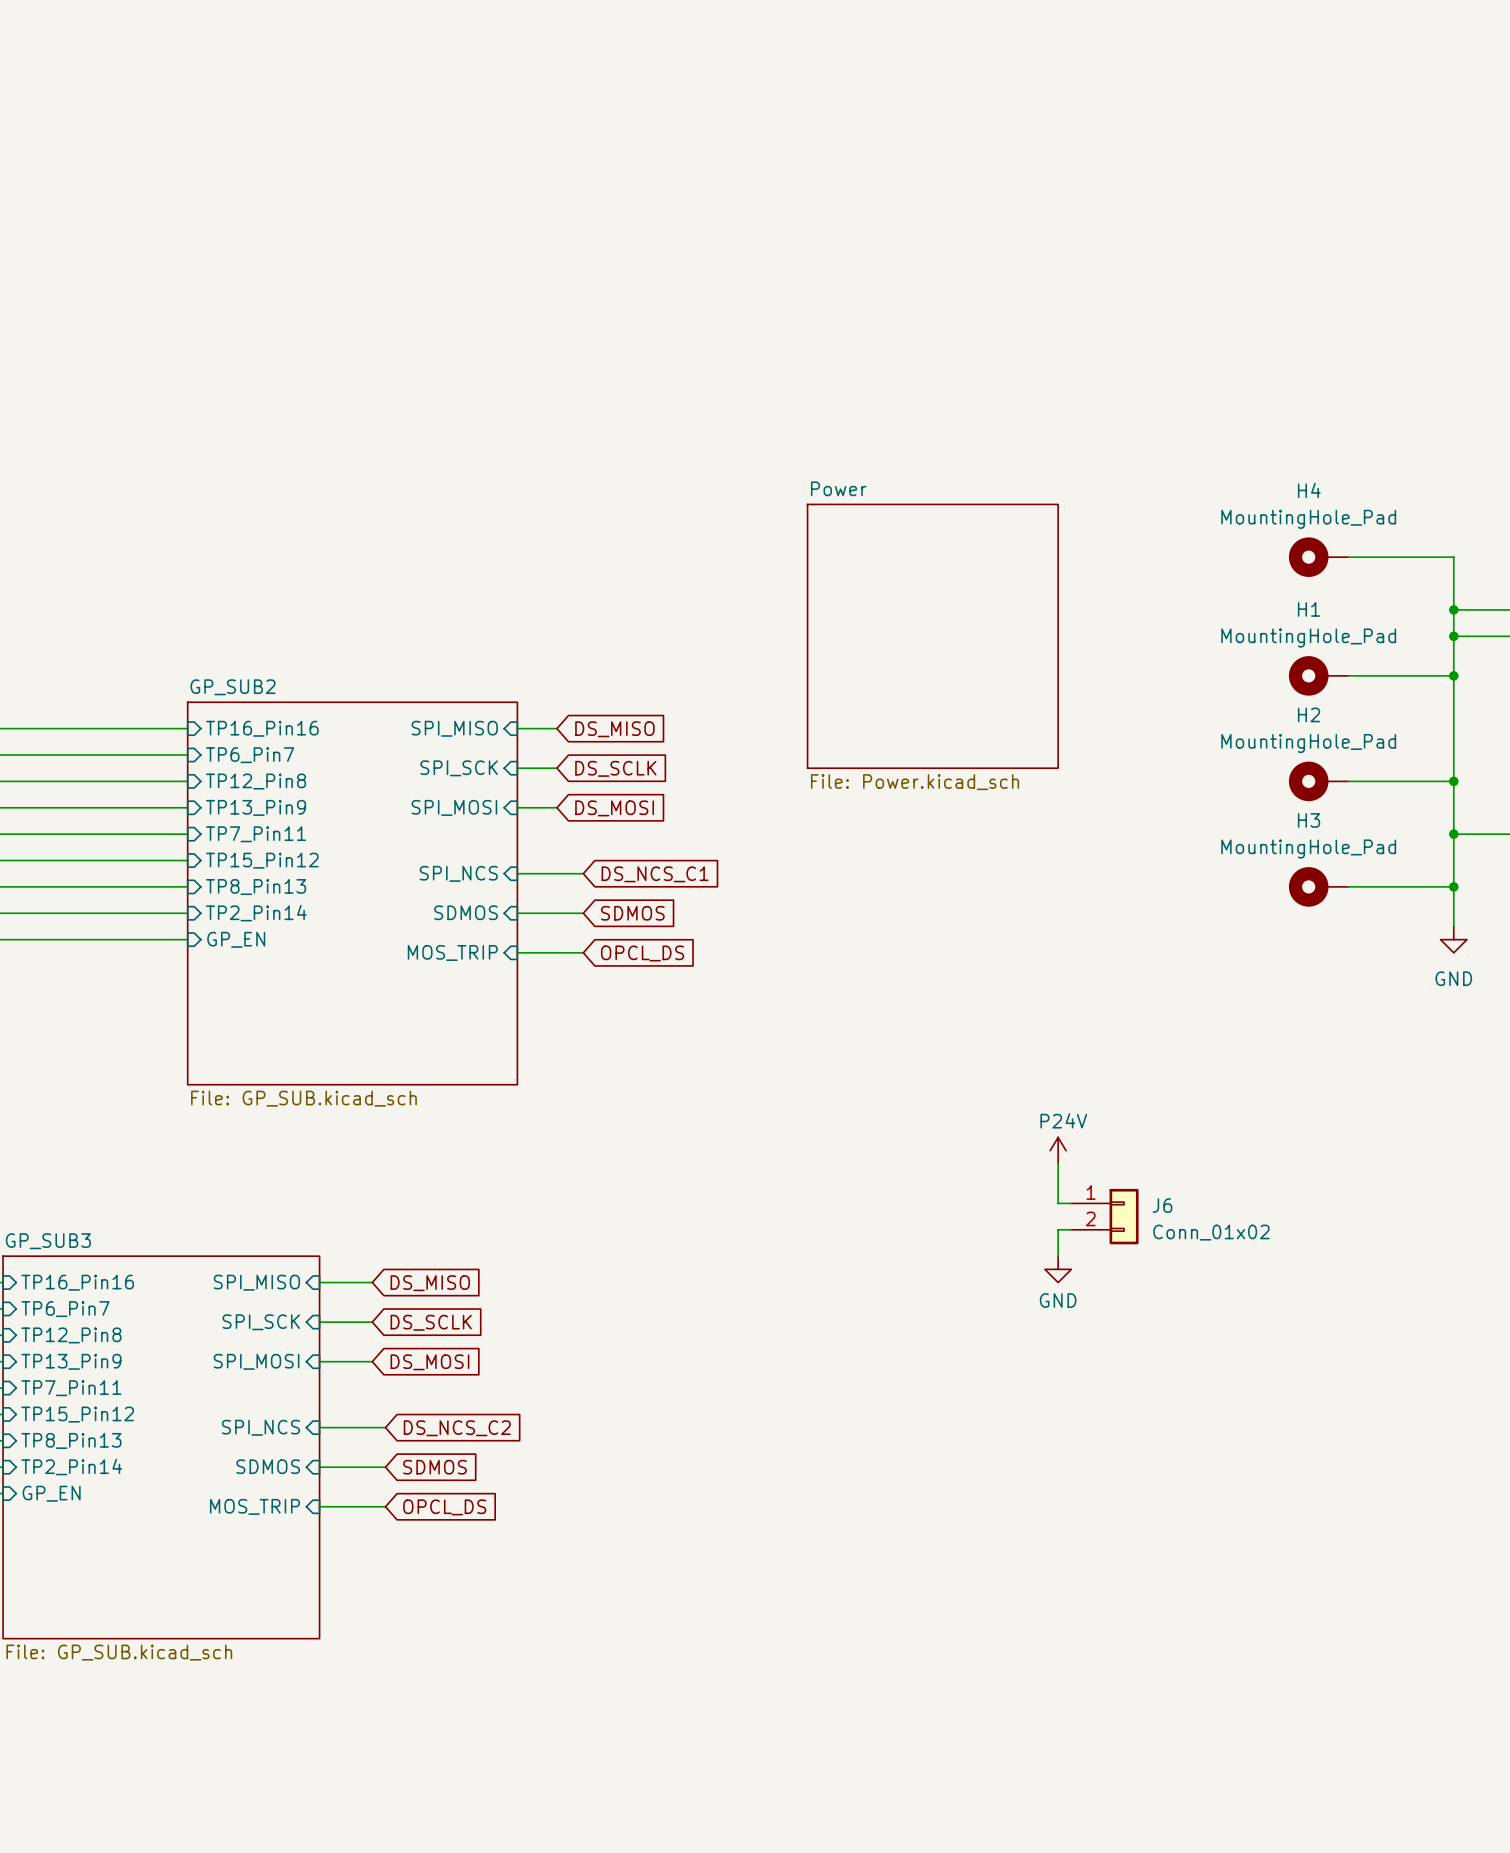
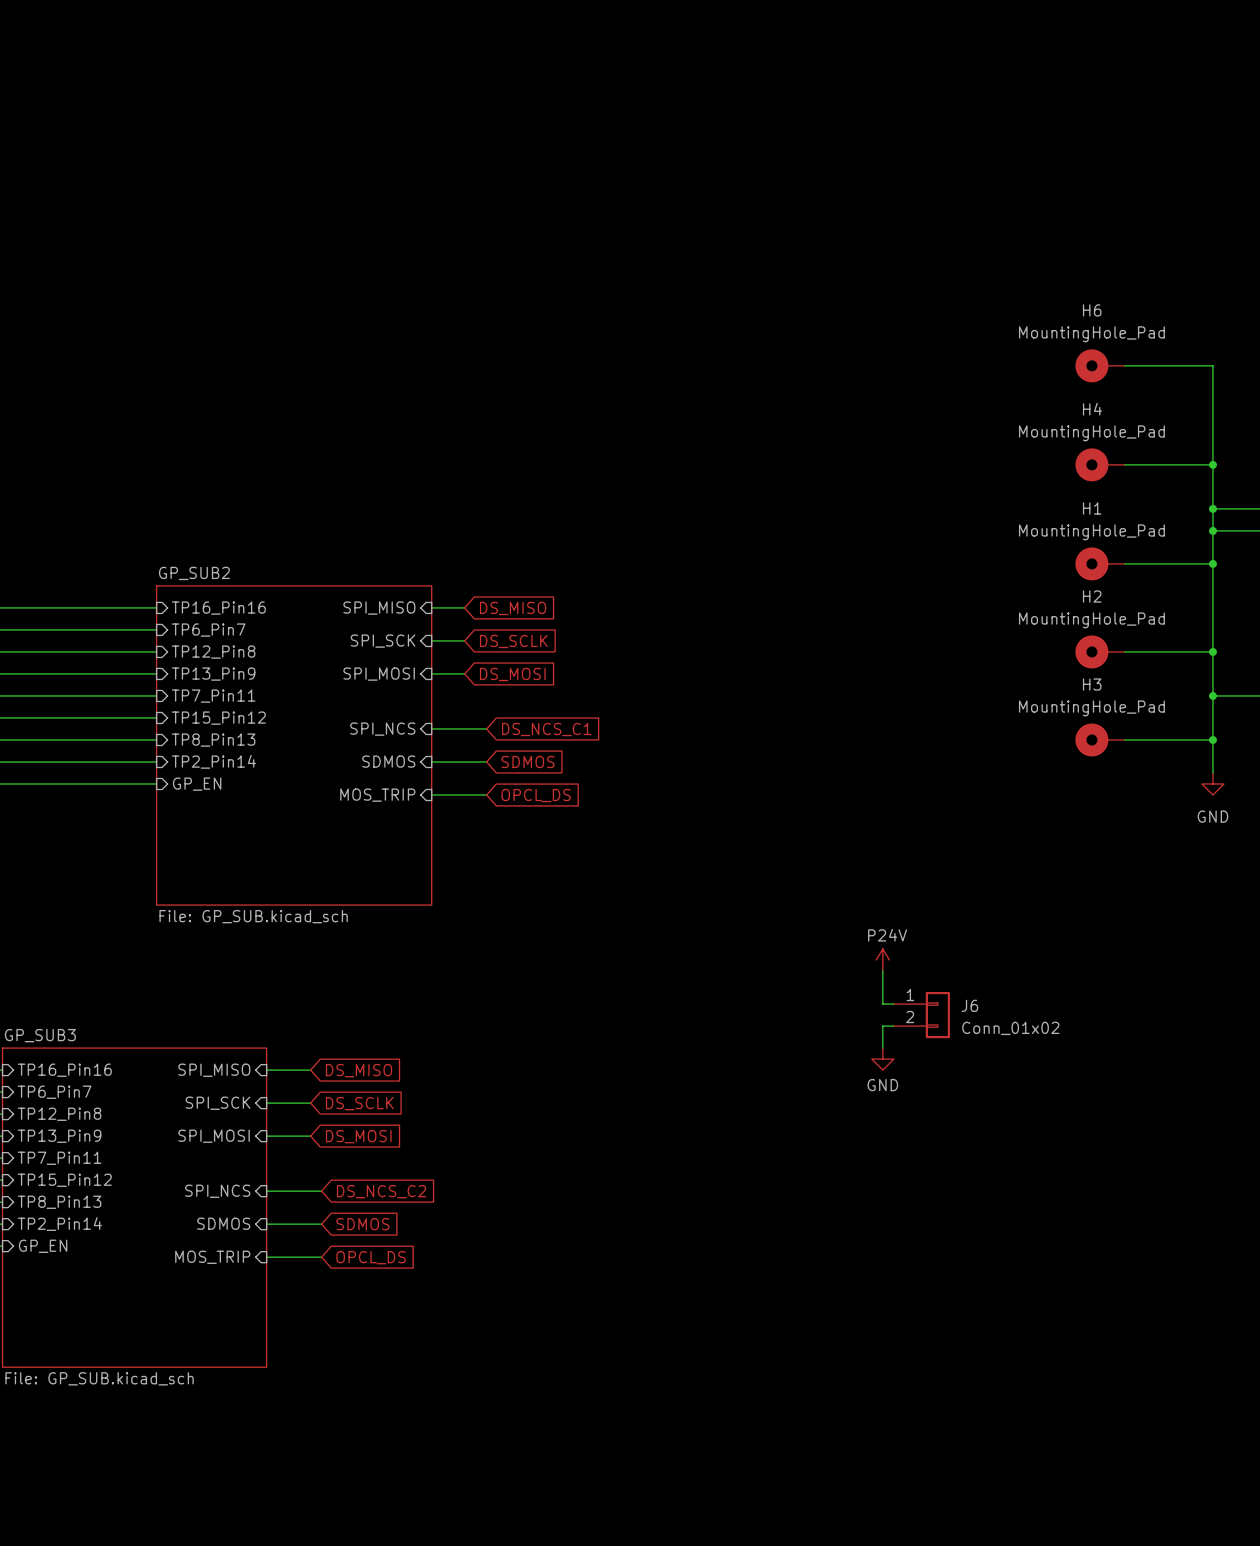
H6: none -> MountingHole_Pad (1100, 365)
wire: none -> (1124, 365) (1212, 365) (1212, 464)
junction: none -> (1212, 464)
sheet Power: File: Power.kicad_sch (932, 636) -> none

